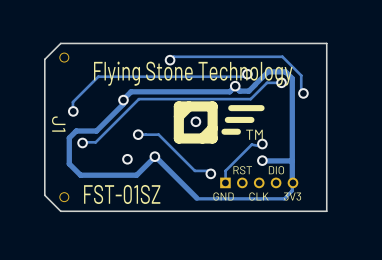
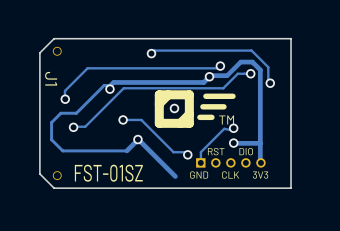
track: (285, 71) (268, 71) (255, 84) -> (254, 64) (252, 62) (240, 62) (227, 75) (207, 75) (203, 82) (113, 82) (110, 85) (104, 85) (76, 113) (60, 113) (51, 122) (51, 139) (62, 150) (126, 150)
text: Flying Stone Technology (193, 73) -> none
track: (255, 84) (248, 91) (239, 91) (235, 86) (229, 91) (131, 91) (123, 99) -> none
track: (123, 100) (123, 104) (96, 131) (76, 131) (69, 138) (69, 163) (80, 175) (136, 175) (142, 169) -> none
text position: J1 (58, 124) -> J1 (51, 78)
via: (127, 159) -> none
track: (292, 184) (292, 190) (289, 193) -> none
track: (289, 193) (284, 198) (196, 198) -> none

